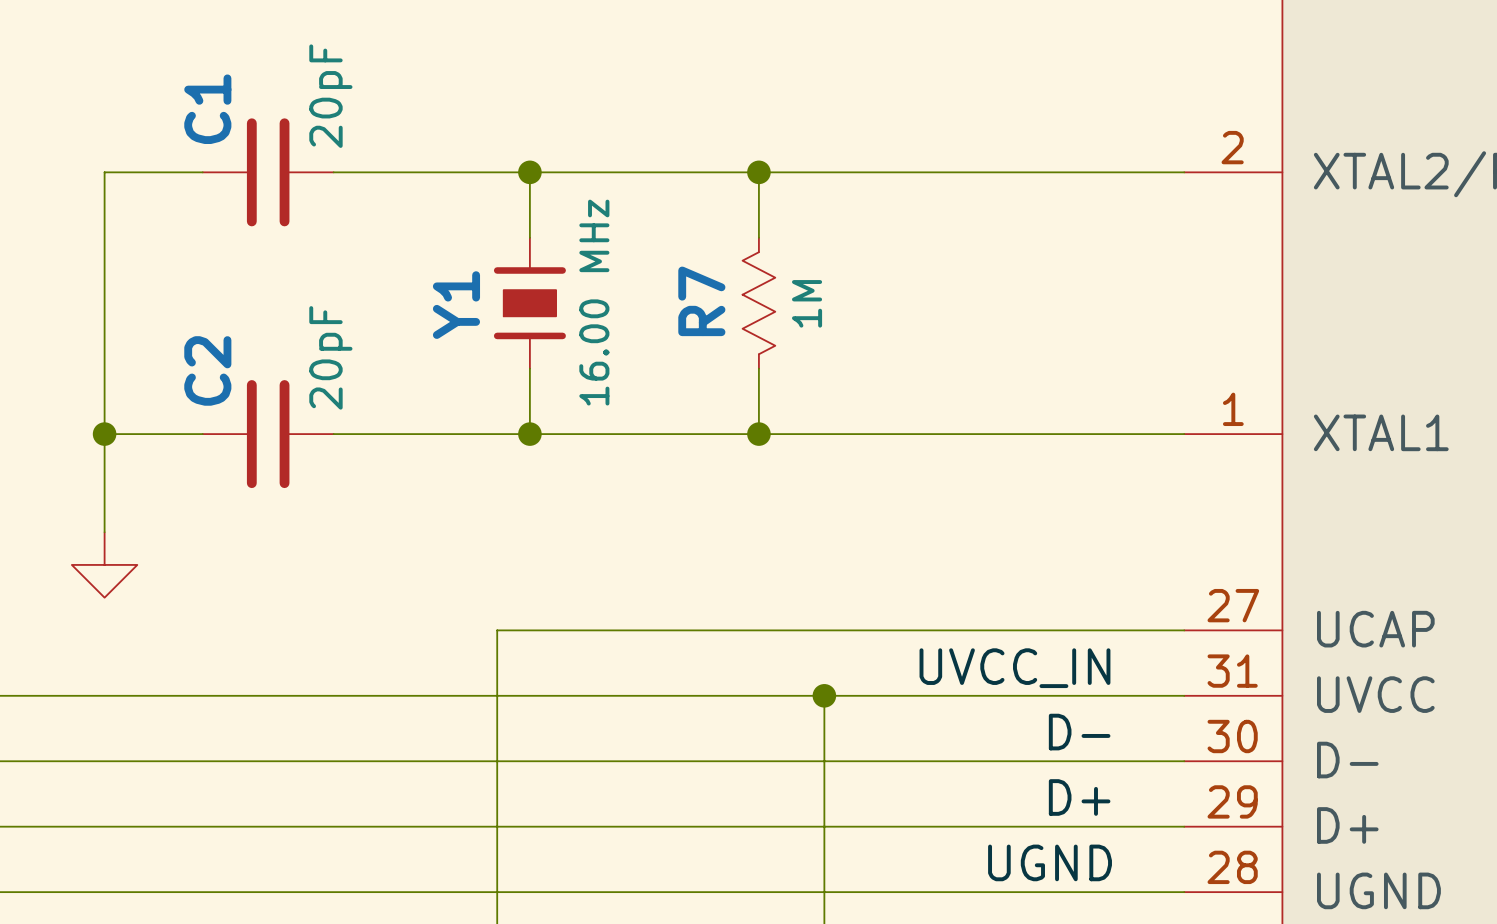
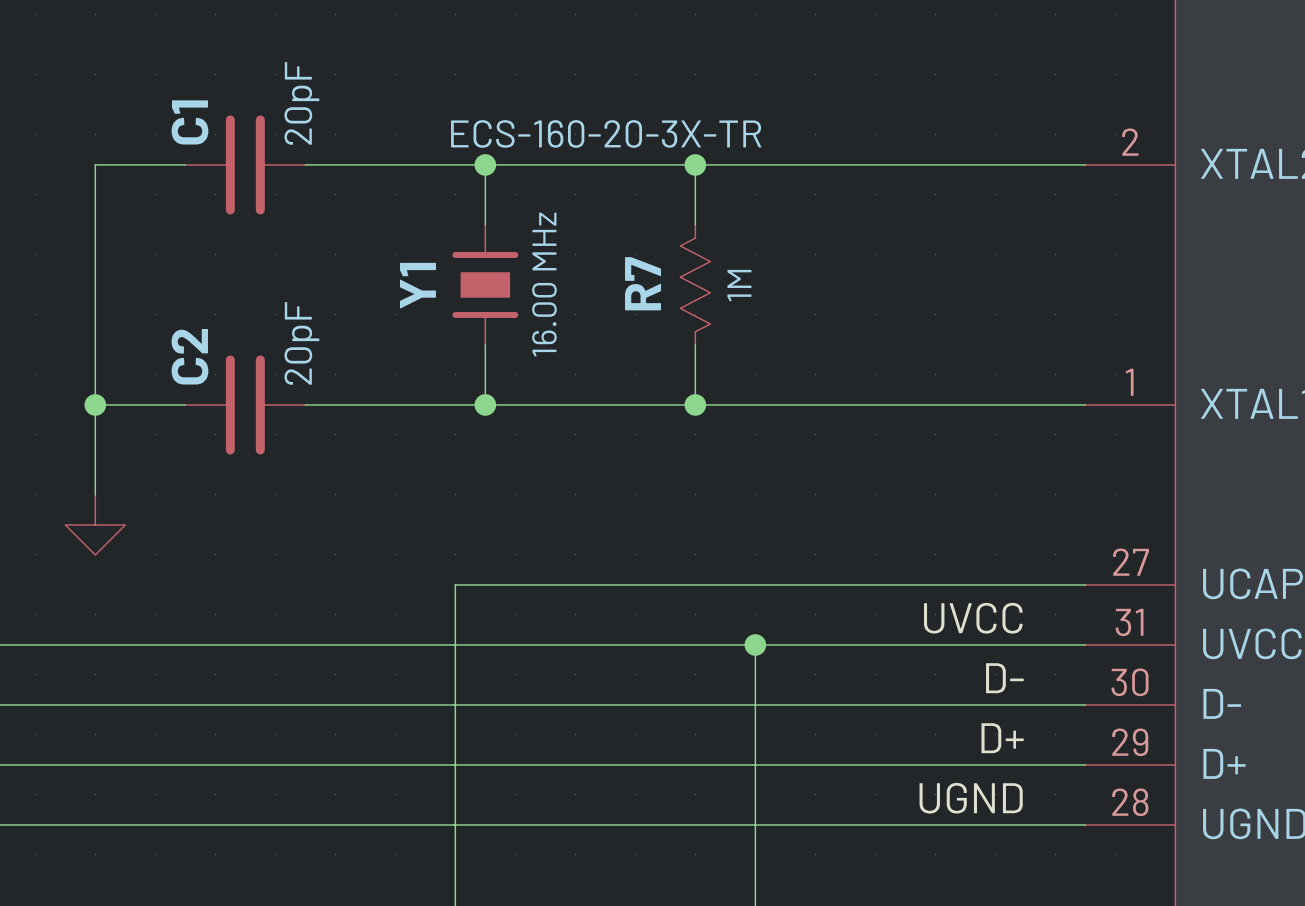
Y1 text: none -> ECS-160-20-3X-TR (606, 133)
label: UVCC_IN (1014, 668) -> UVCC (973, 618)

